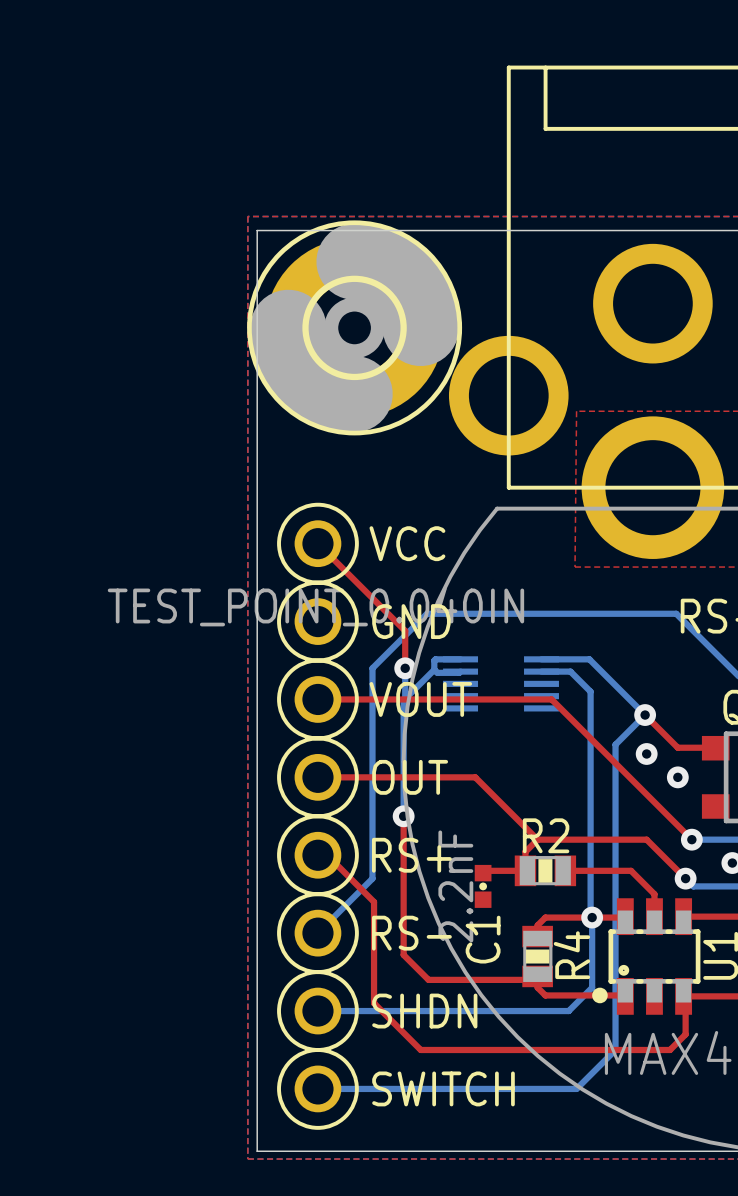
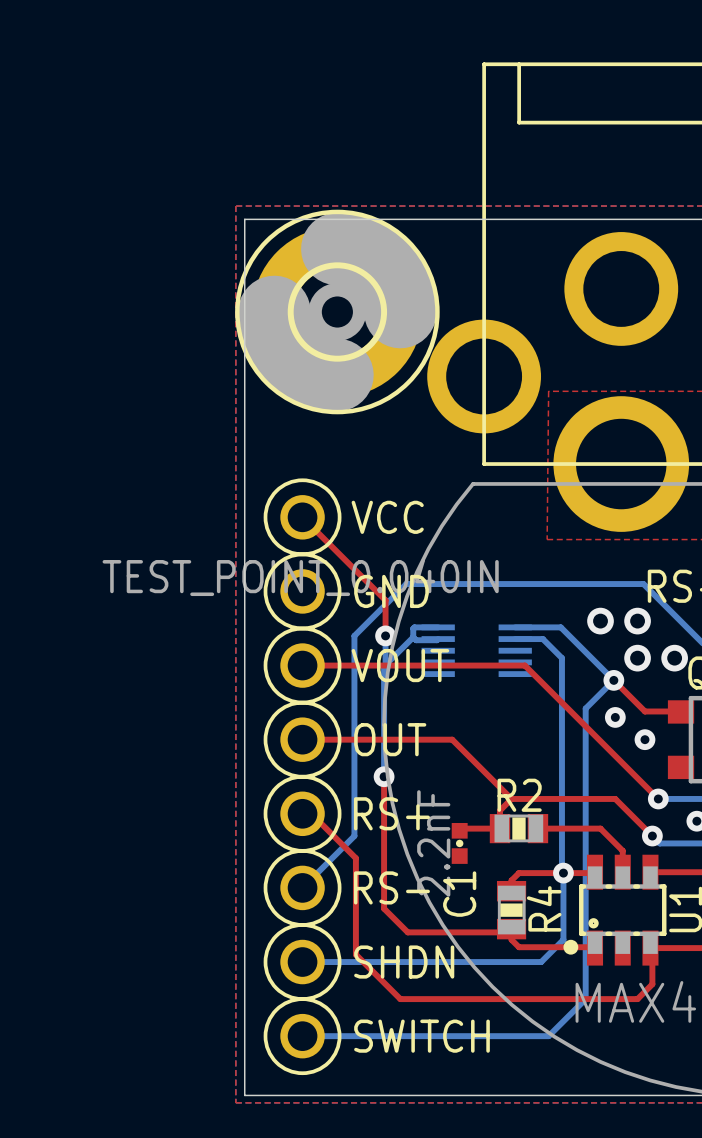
via: none -> (600, 621)
via: none -> (637, 621)
via: none -> (637, 658)
via: none -> (674, 658)

